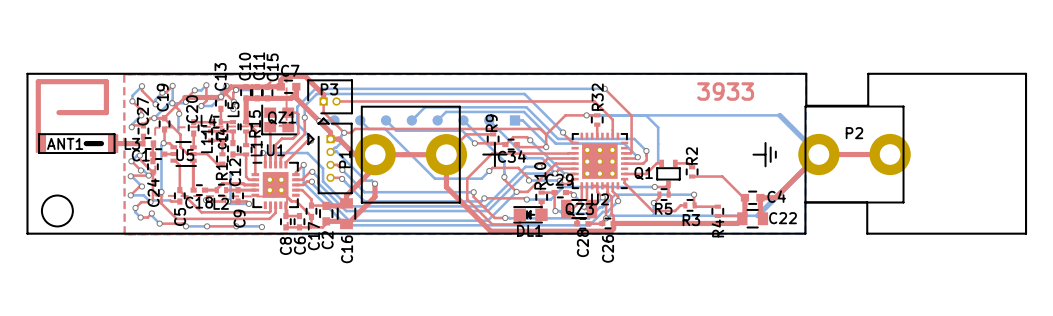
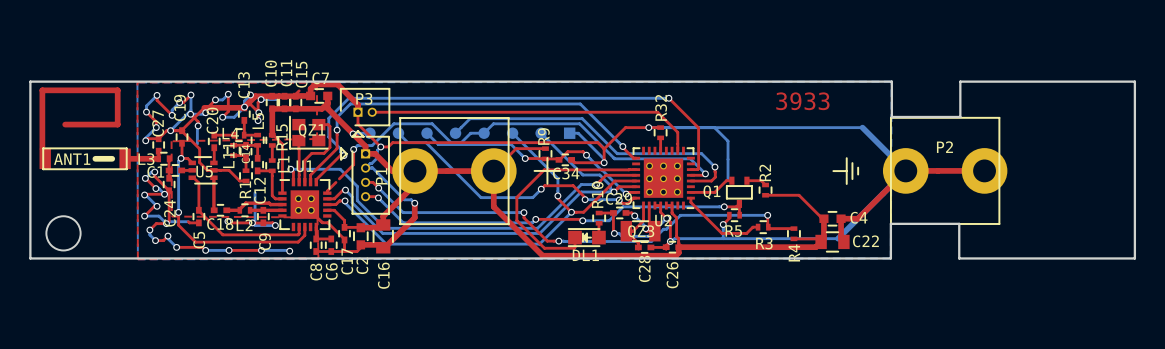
bottom track: none -> (484, 133) (470, 133) (461, 142) (451, 142) (432, 123) (393, 123) (372, 145) (357, 145) (353, 149)
top track: none -> (353, 149) (353, 164) (339, 178)
bottom track: (303, 164) (303, 182) (346, 225) (589, 225) (602, 211) (607, 211) (618, 201) -> none
via position: (303, 164) -> (353, 149)
top track: (612, 185) (612, 191) (618, 196) (618, 201) -> none
via: (618, 201) -> none

